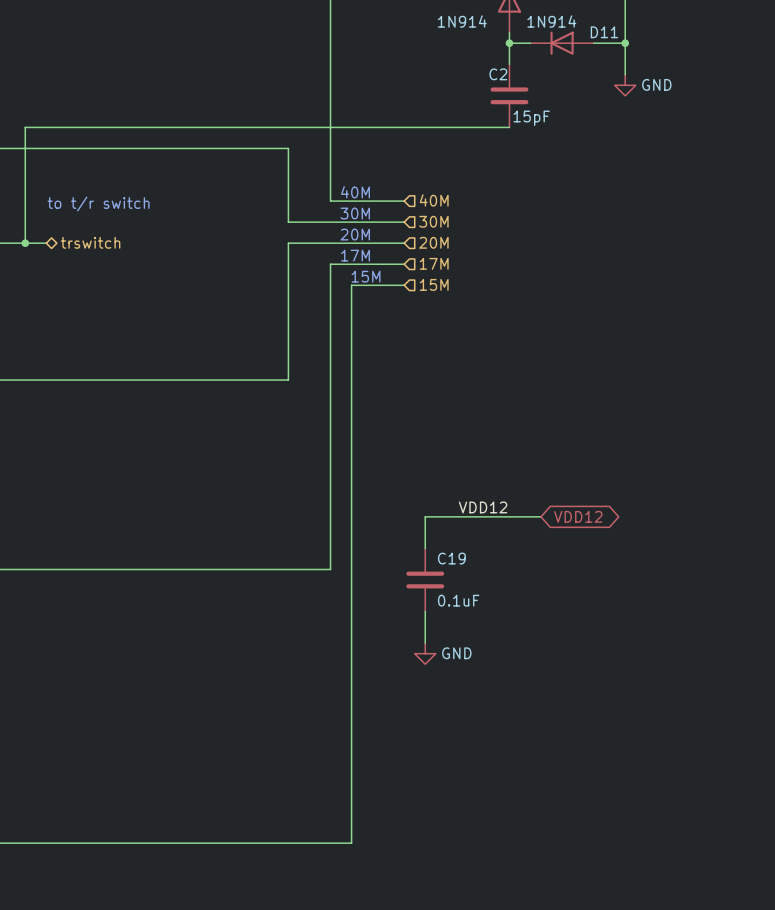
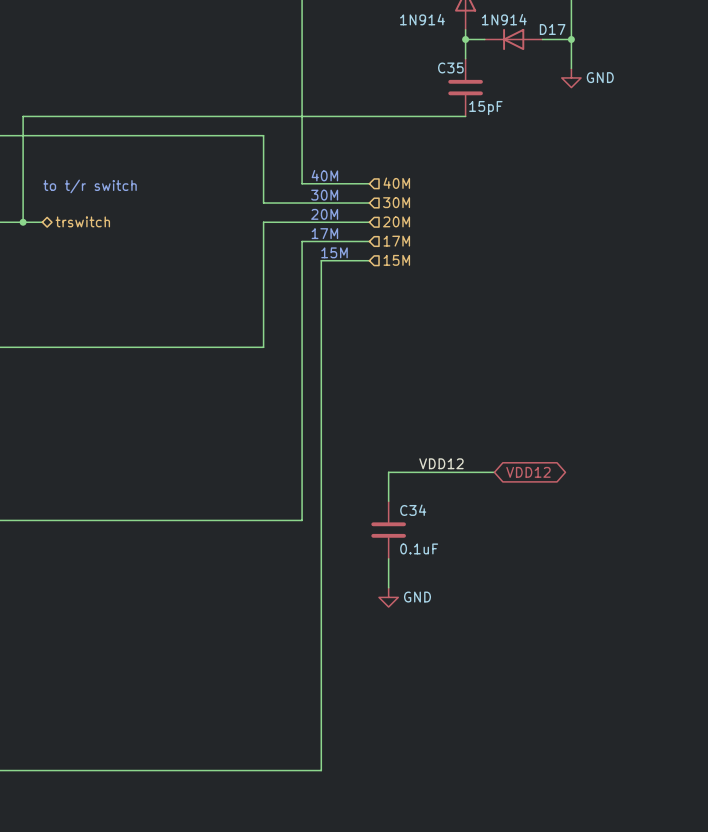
D11 name: D11 (604, 32) -> D17 (552, 29)
C2 name: C2 (498, 74) -> C35 (450, 67)
C19 name: C19 (451, 558) -> C34 (413, 510)

